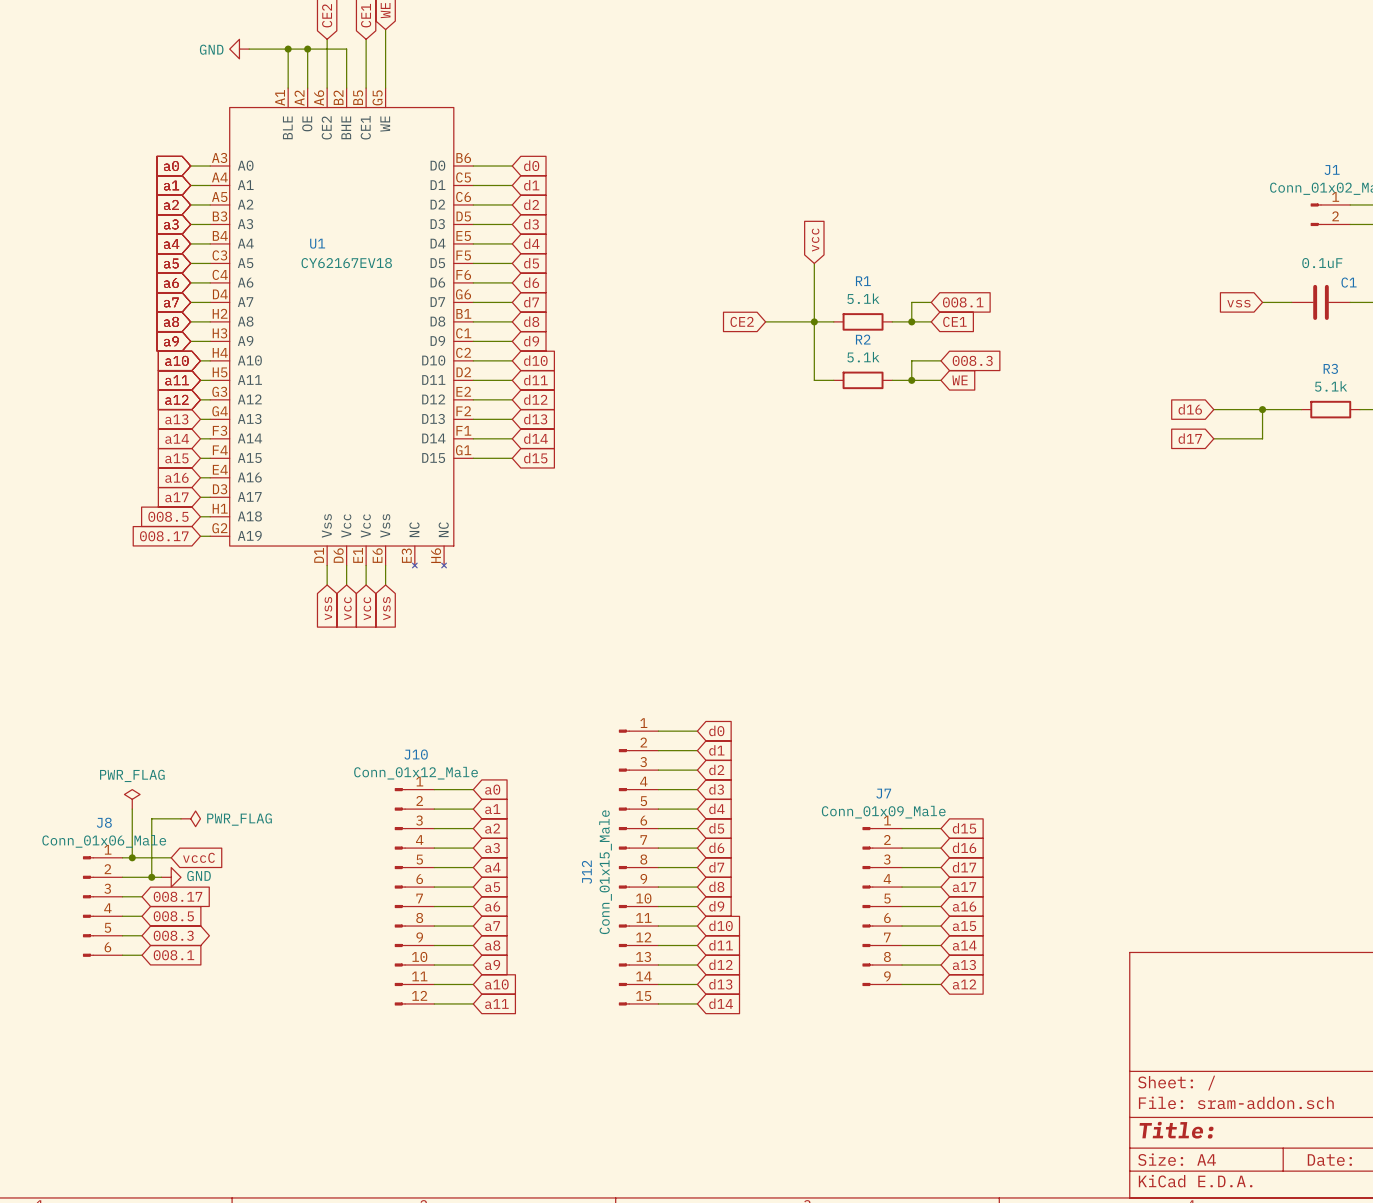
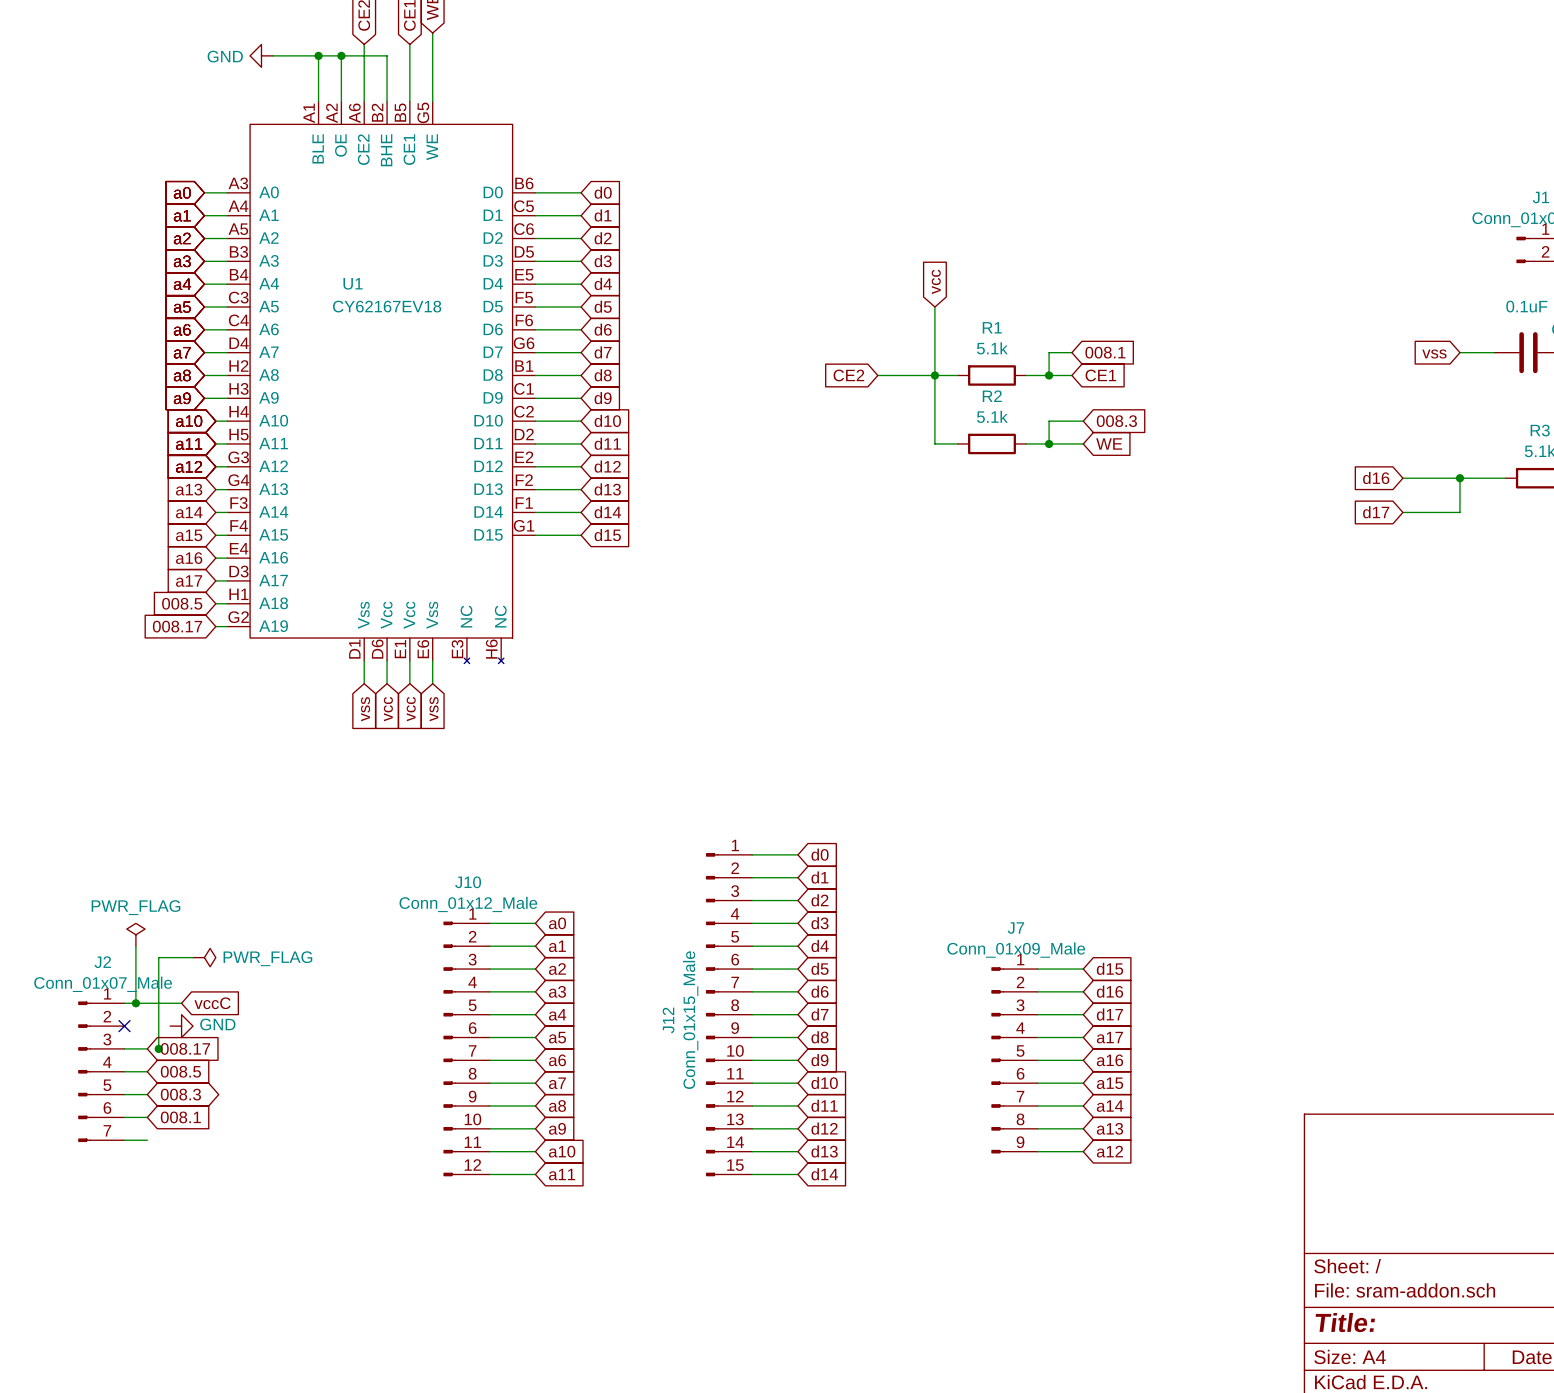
wire: (122, 877) (161, 877) -> none
no-connect mark: none -> (124, 1026)
wire: none -> (158, 1026) (158, 1048)
junction position: (151, 877) -> (158, 1048)
J8: Conn_01x06_Male (102, 906) -> none
J2: none -> Conn_01x07_Male (101, 1071)
wire: none -> (124, 1140) (147, 1140)

